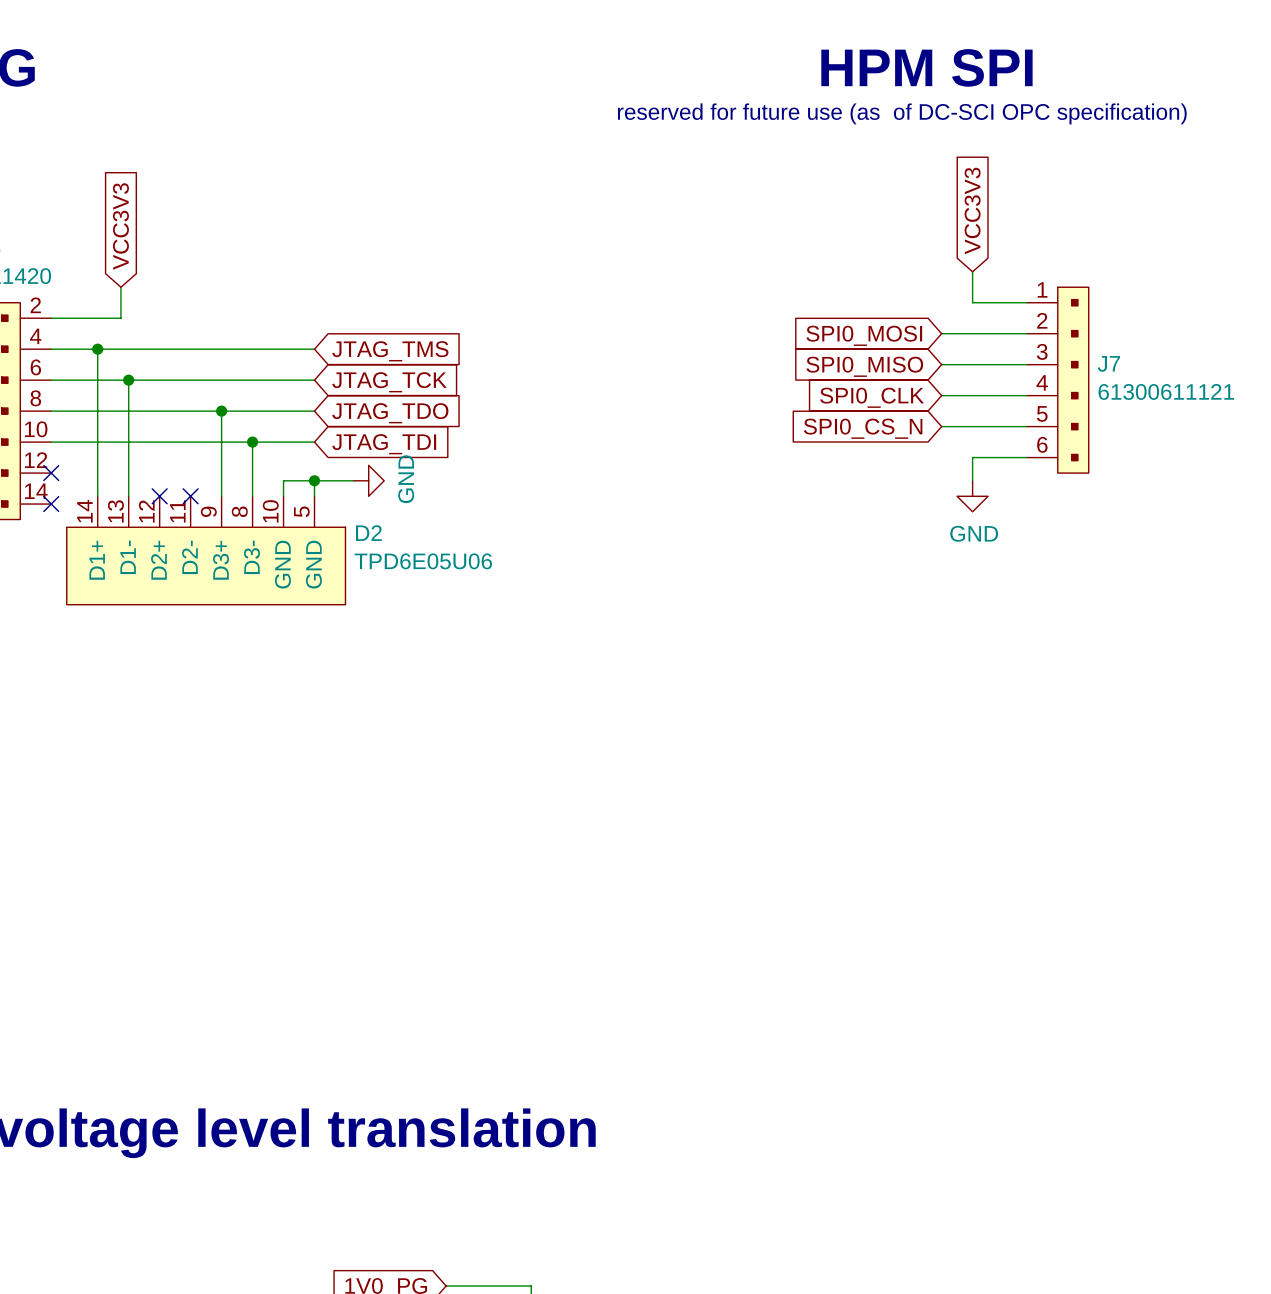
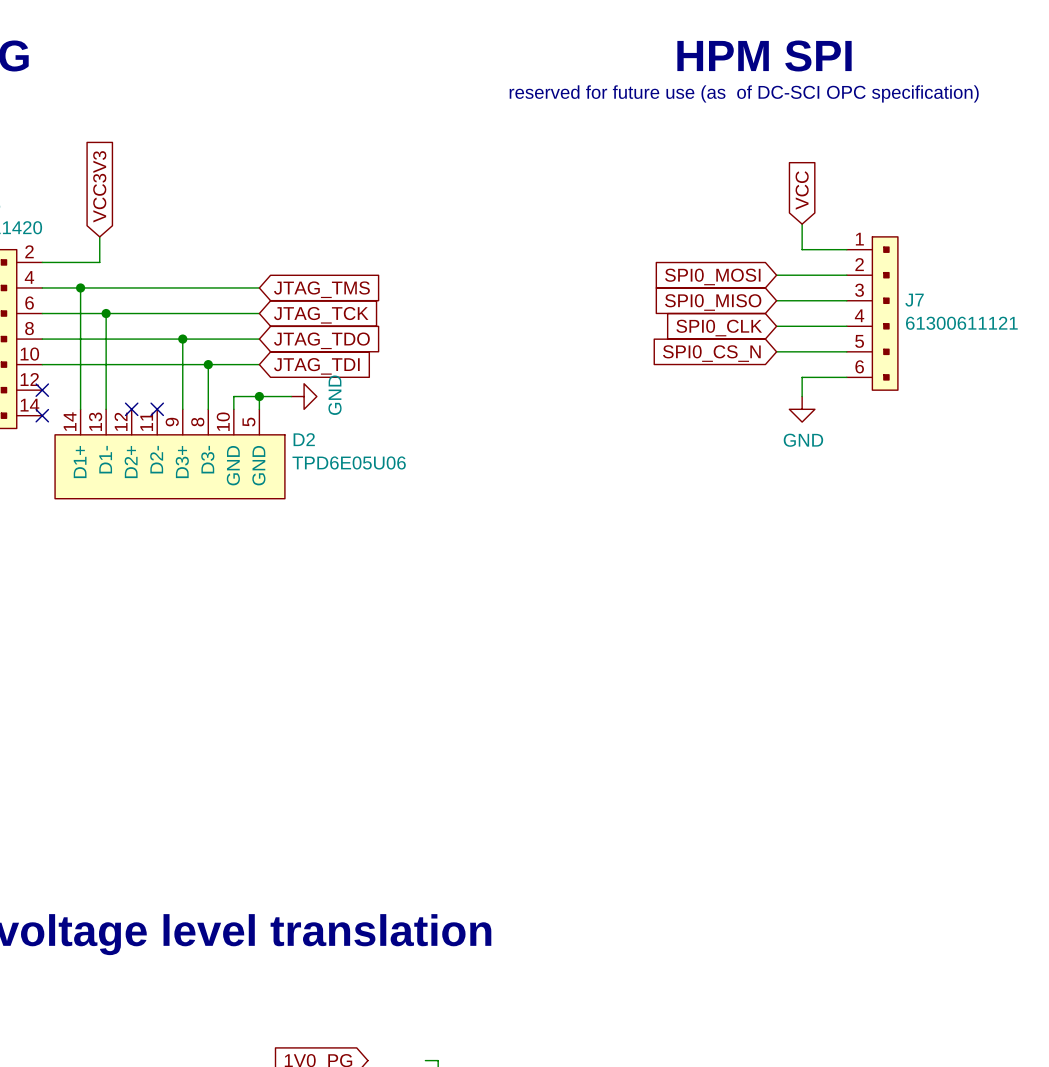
global label: VCC3V3 (972, 211) -> VCC (802, 190)
wire: (446, 1286) (515, 1286) -> none

